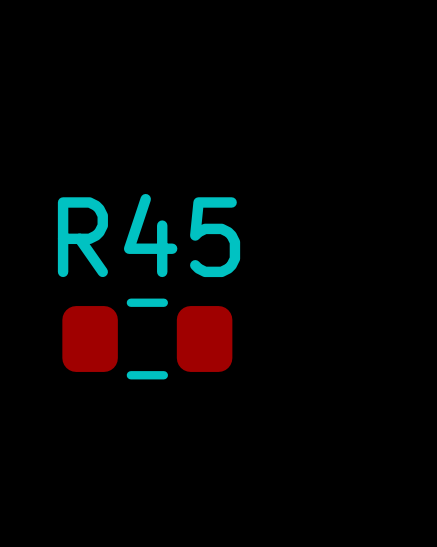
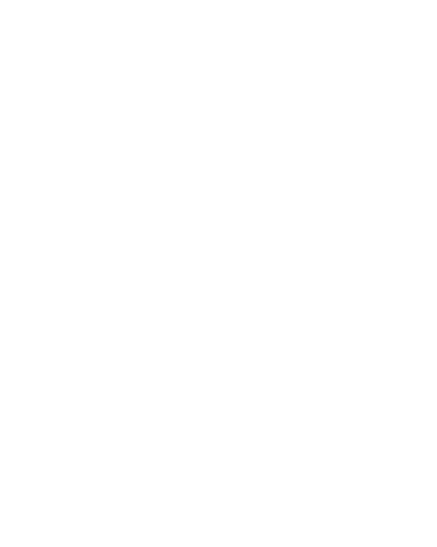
R45: (147, 339) -> none

